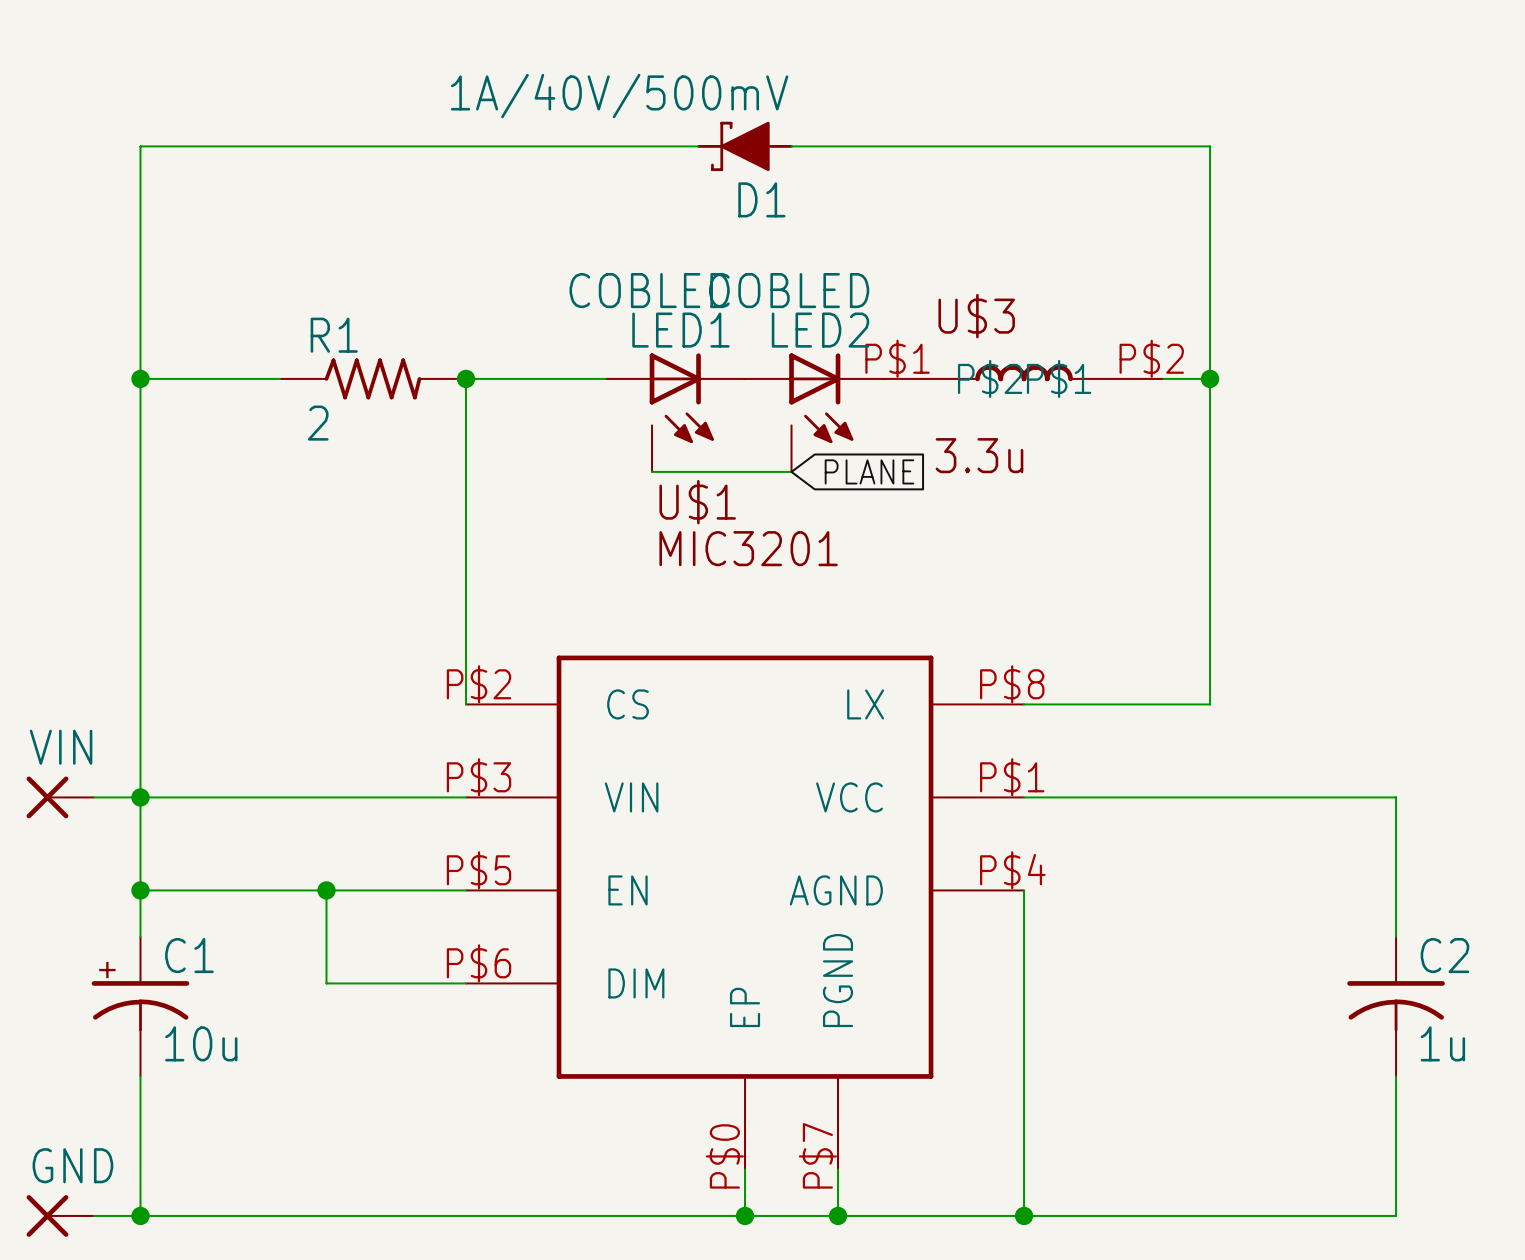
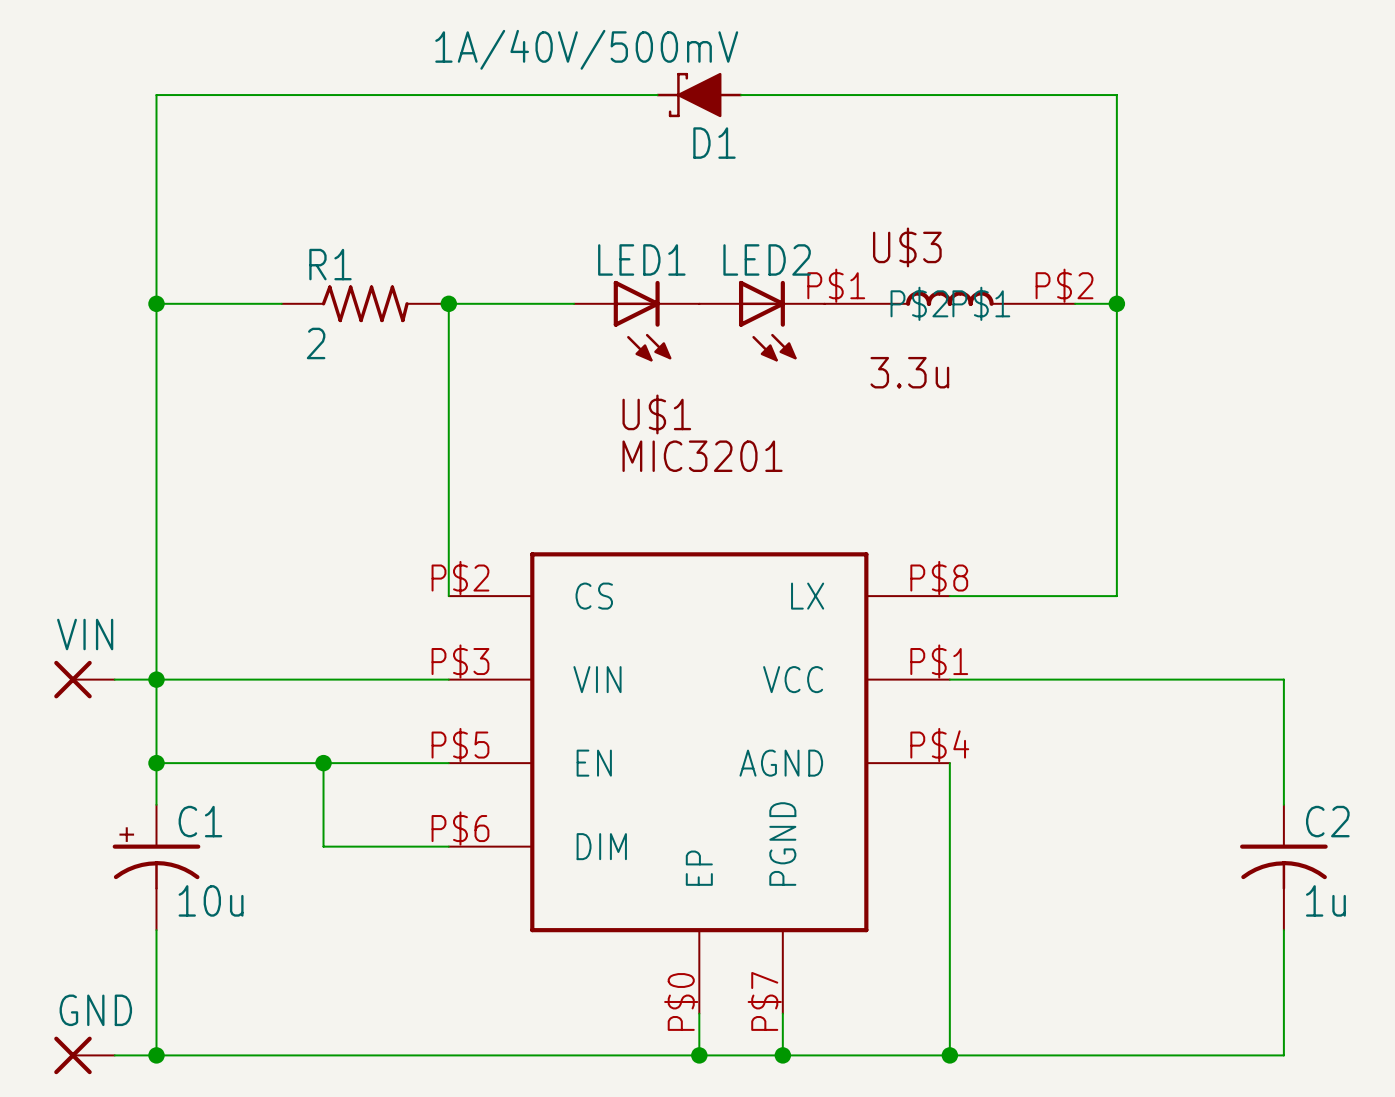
LED1 value: COBLED (649, 290) -> none
LED2 value: COBLED (789, 290) -> none
LED1 symbol: [605, 353, 746, 472] -> [574, 280, 700, 362]
LED2 symbol: [745, 353, 885, 472] -> [699, 280, 825, 362]
wire: (652, 471) (791, 471) -> none
global label: PLANE (869, 471) -> none

